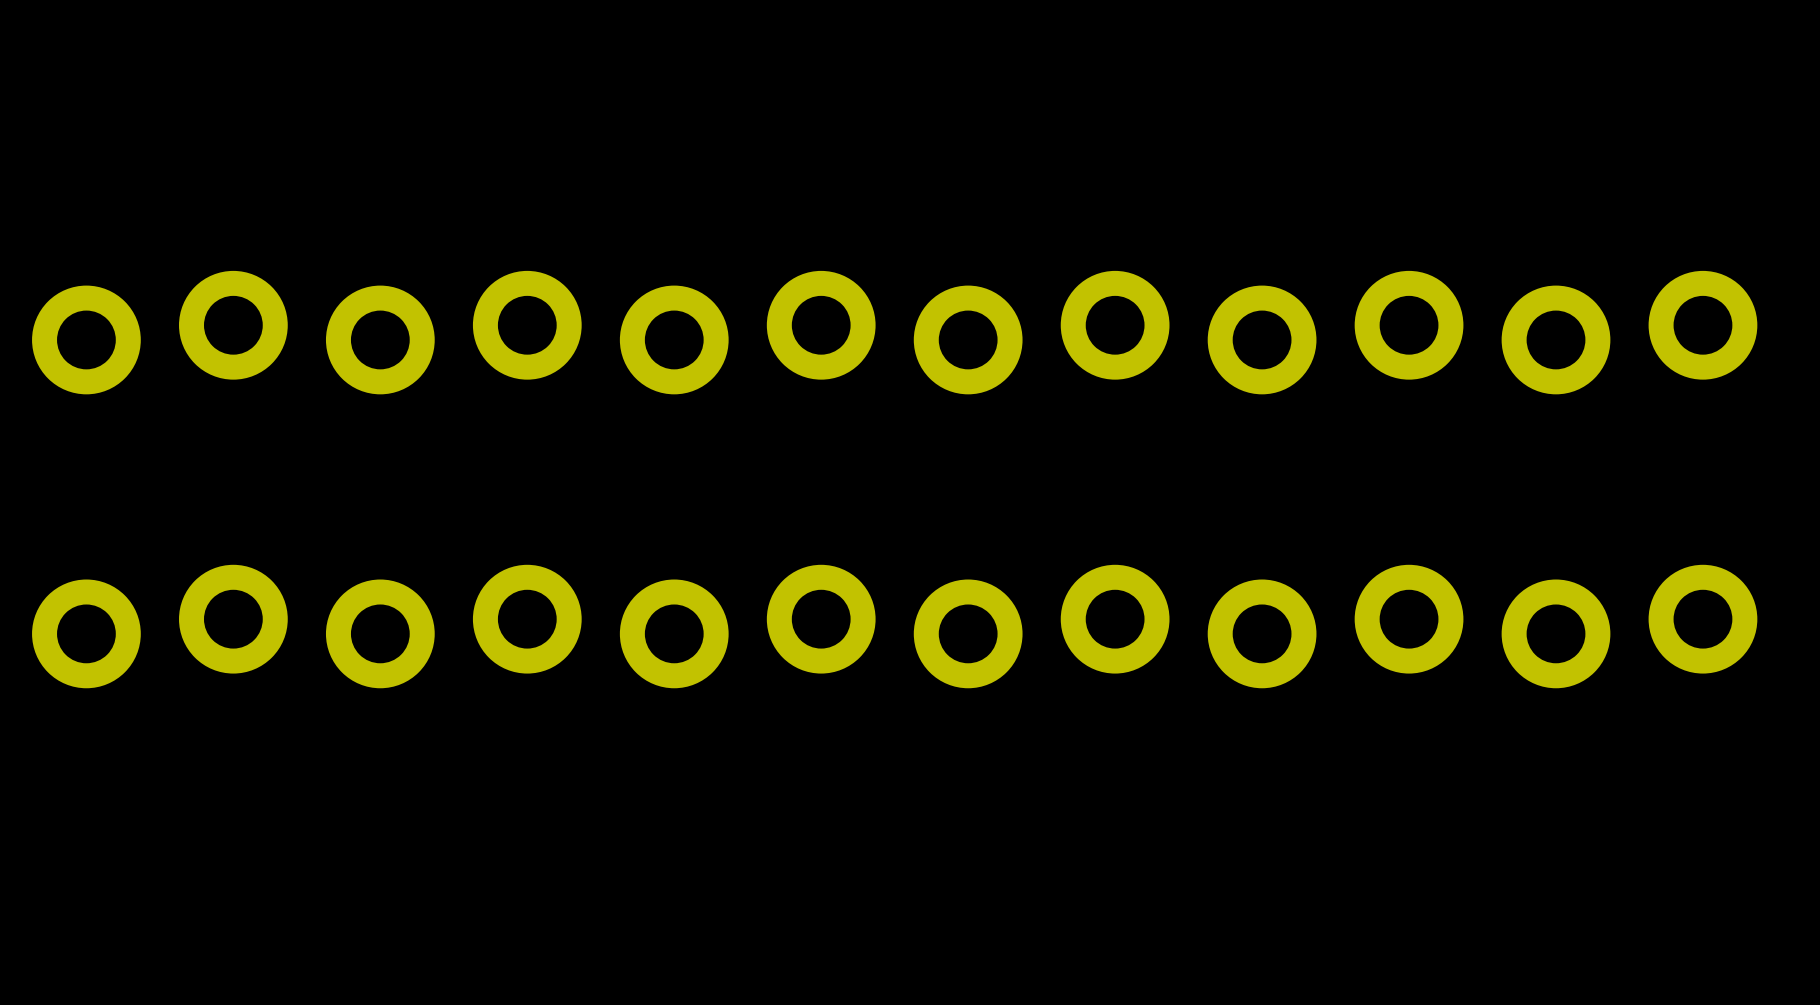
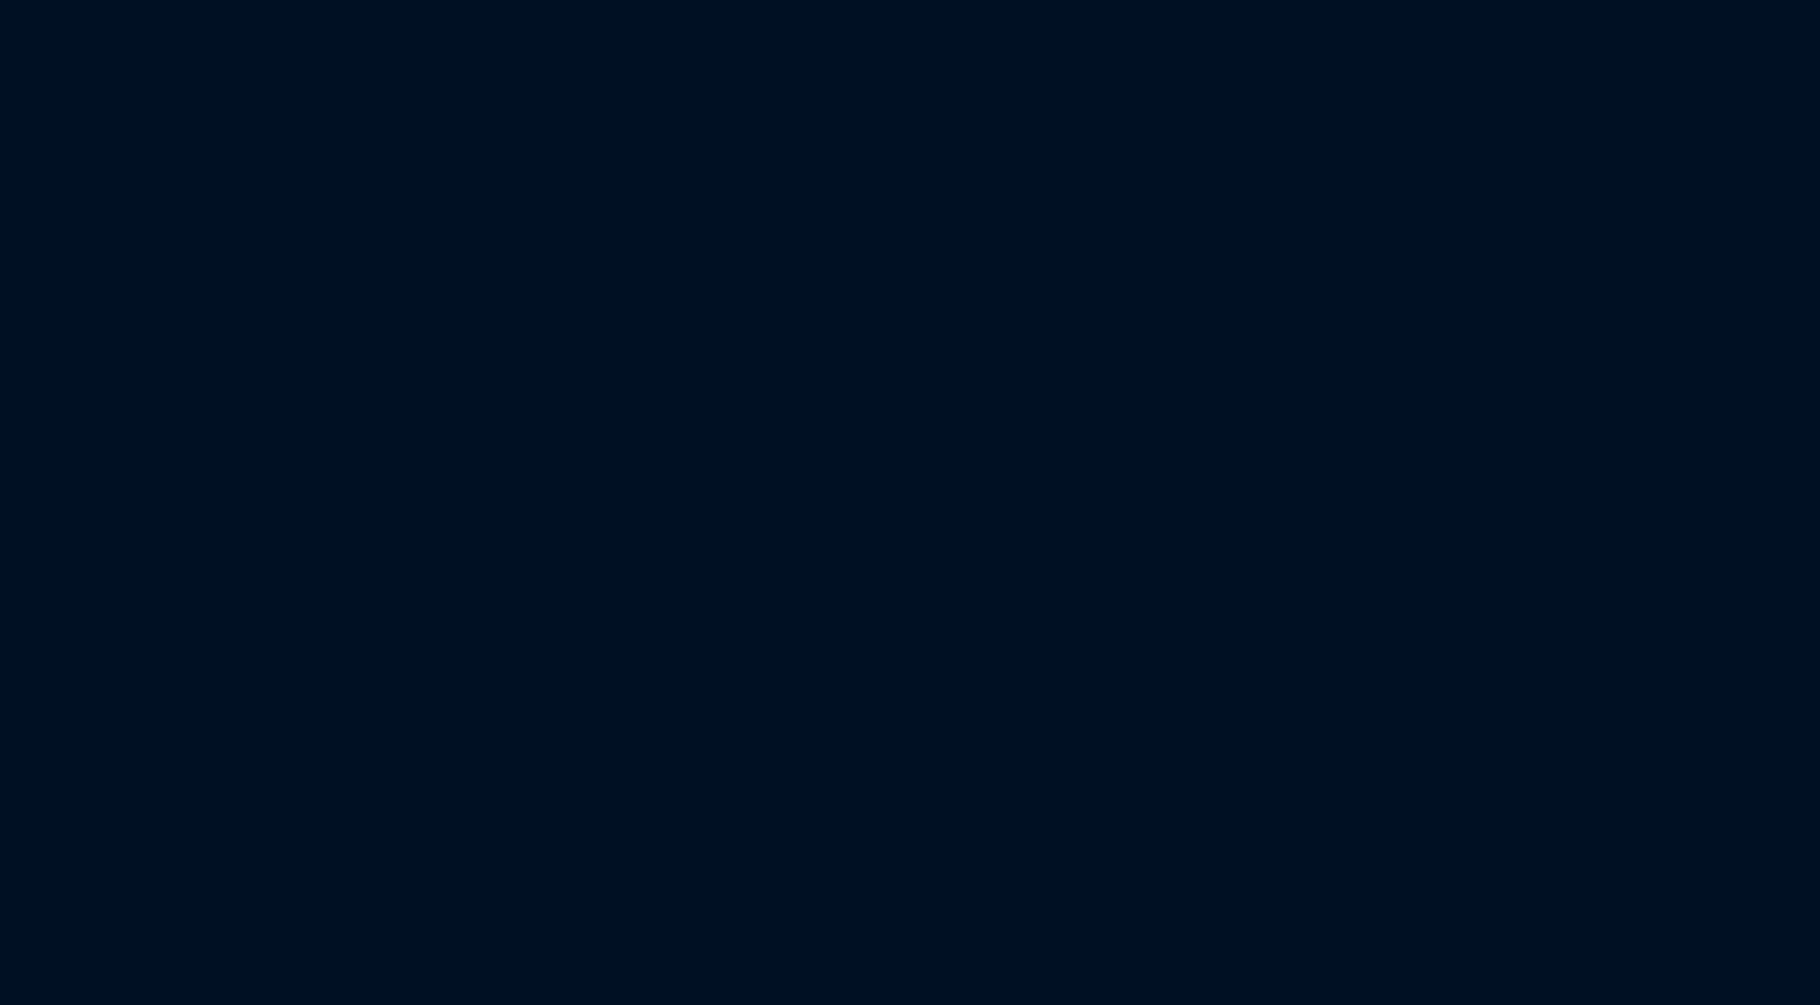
part: (894, 332) -> none
part: (894, 626) -> none

